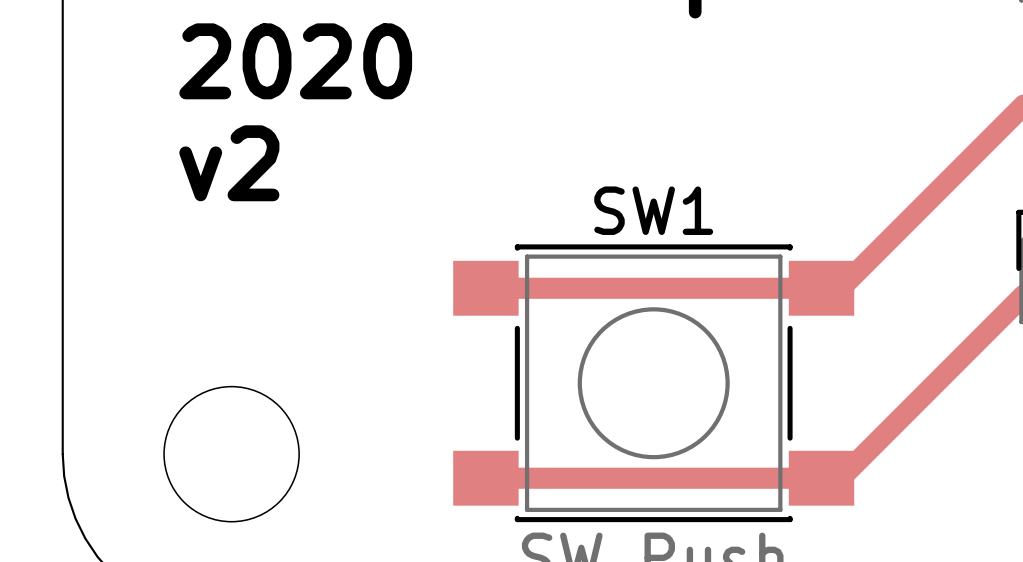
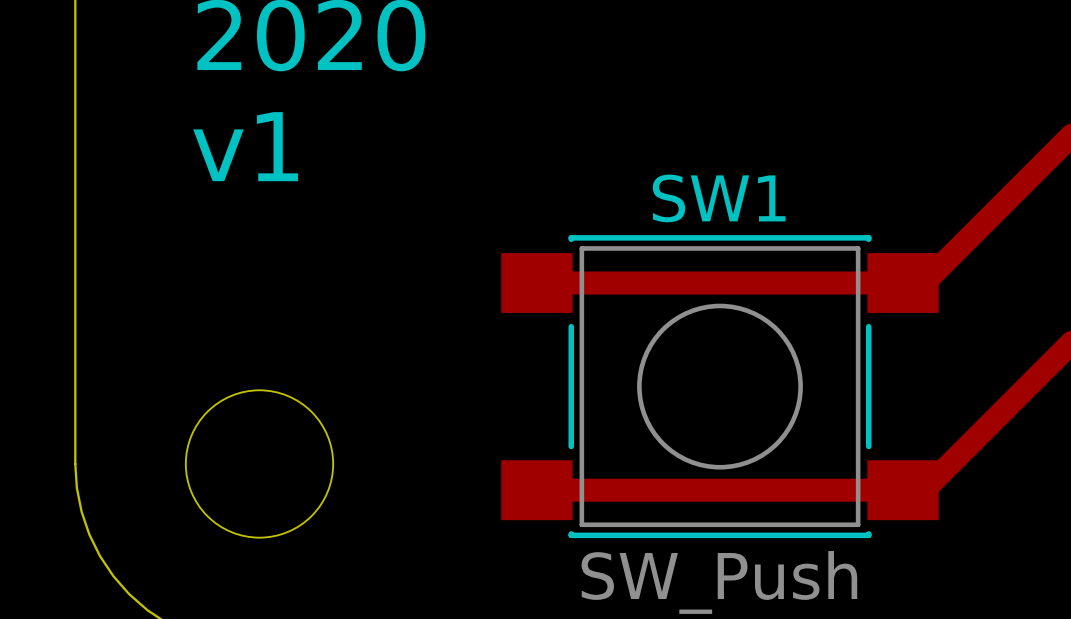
text: v2 (229, 163) -> v1 (245, 146)

